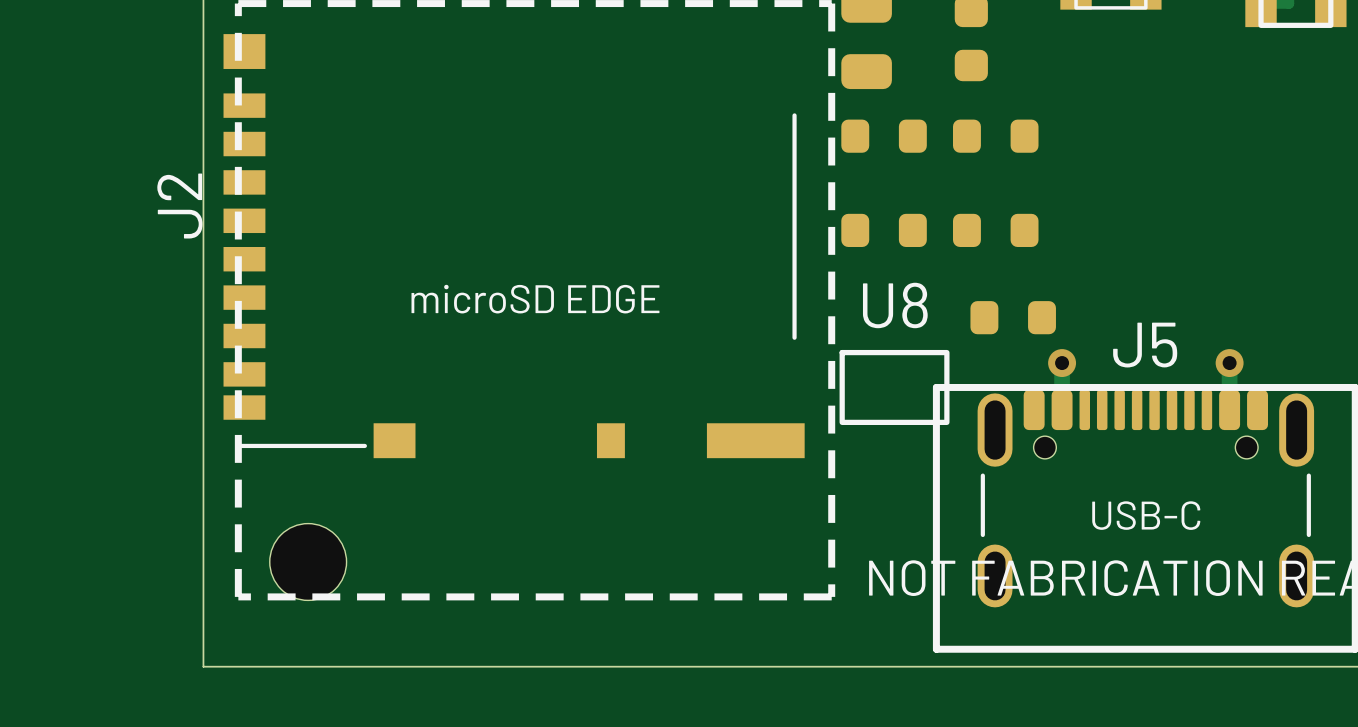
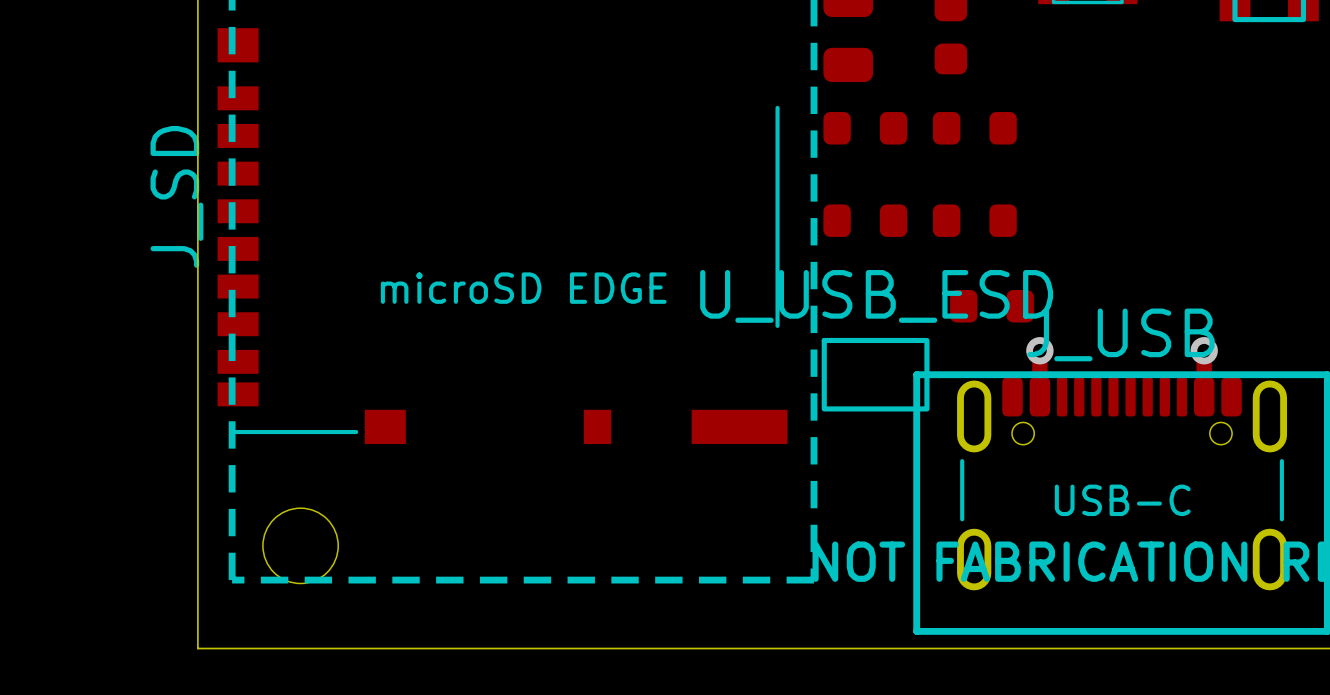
J2 name: J2 (179, 206) -> J_SD (176, 196)
U8 name: U8 (895, 305) -> U_USB_ESD (876, 296)
J5 name: J5 (1145, 345) -> J_USB (1121, 334)

